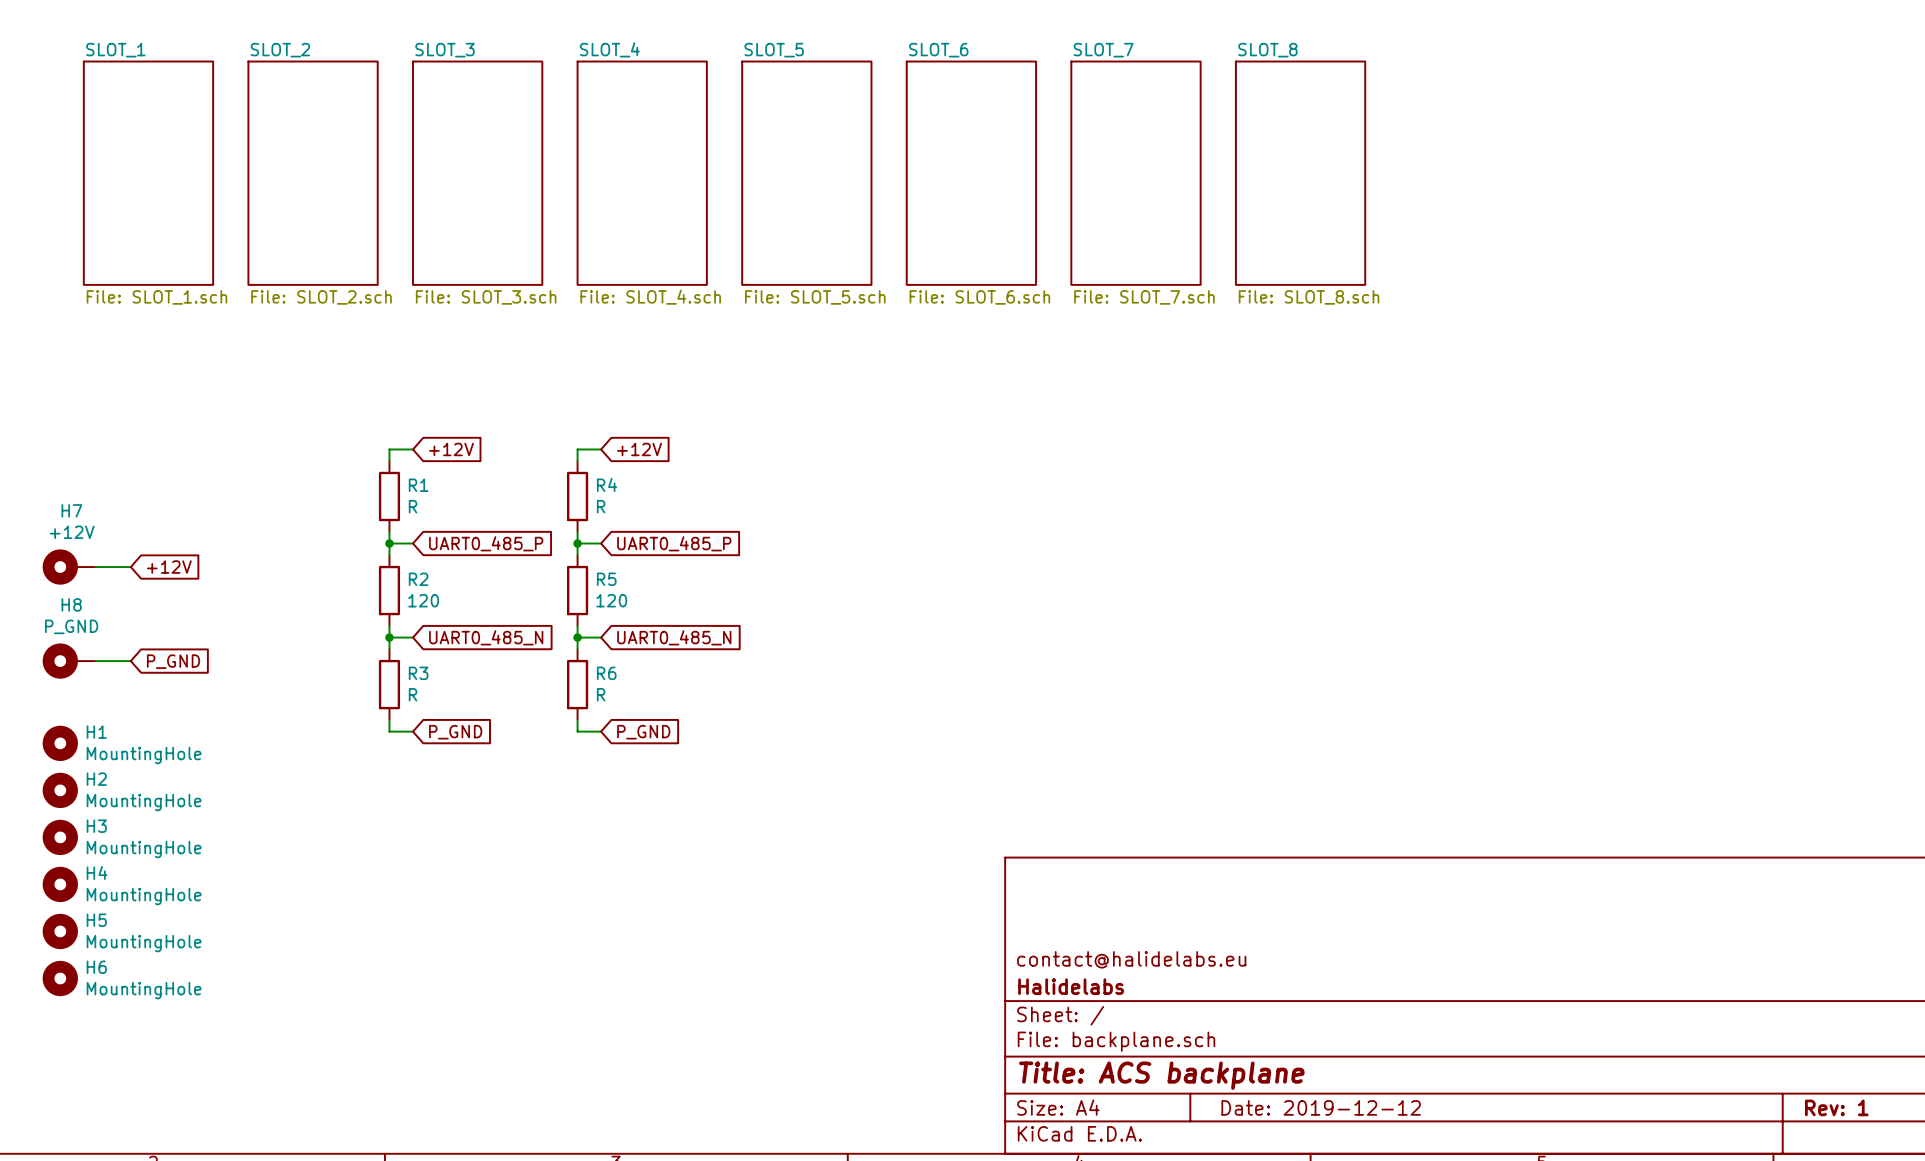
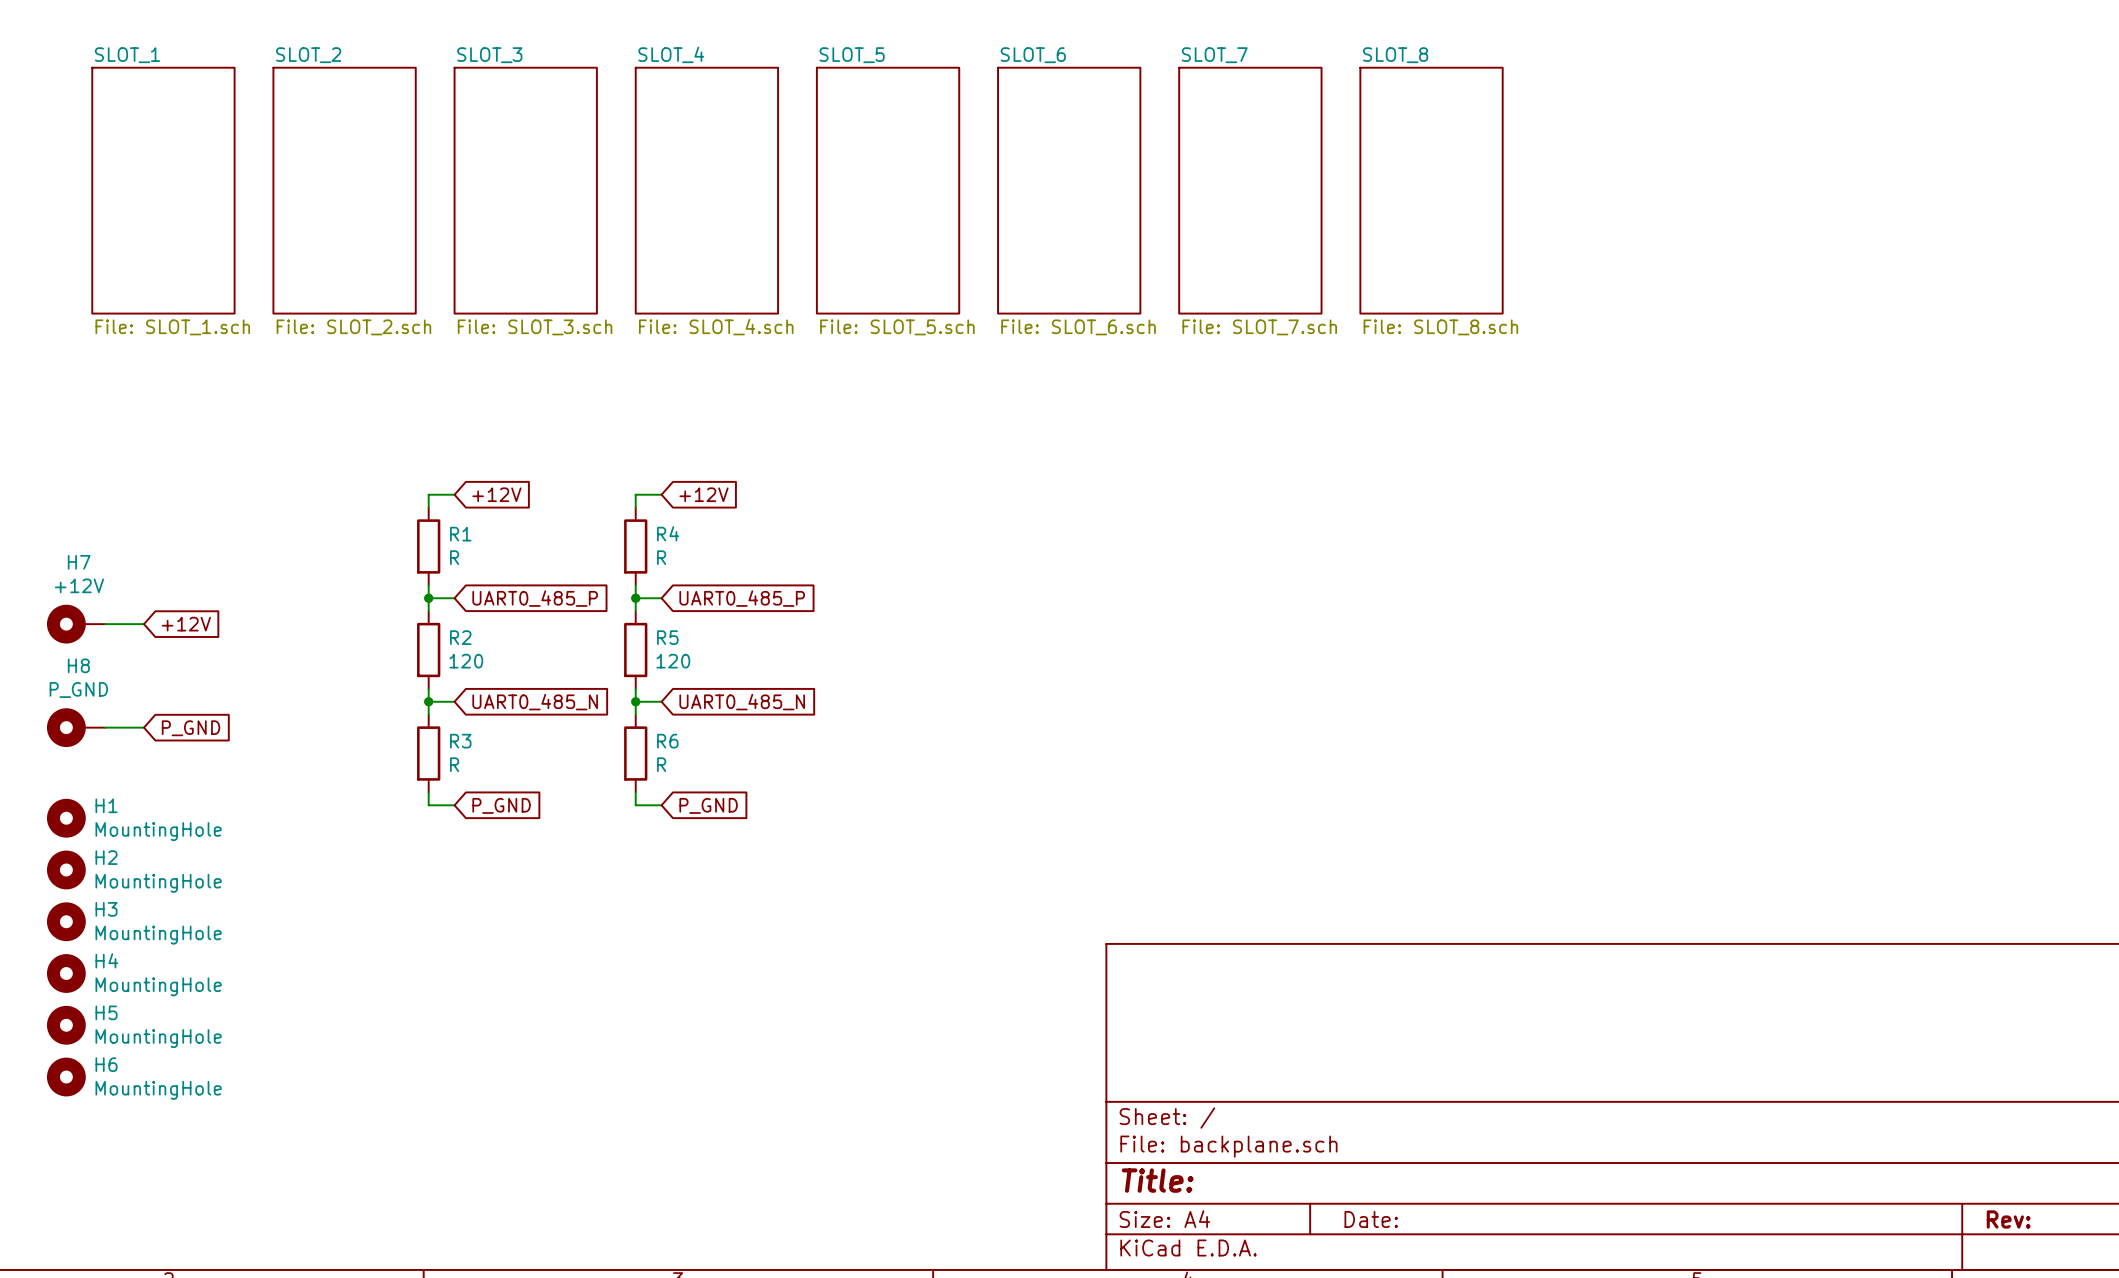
title block: contact@halidelabs.eu (1131, 959) -> none
title block: Halidelabs (1071, 986) -> none
title block: Title: ACS backplane (1161, 1075) -> Title: (1157, 1180)
title block: Date: 2019-12-12 (1321, 1107) -> Date: (1371, 1219)
title block: Rev: 1 (1836, 1107) -> Rev: (2008, 1219)

